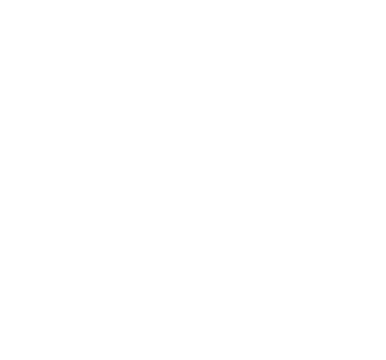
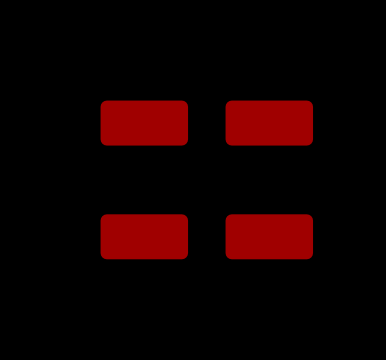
part: none -> (206, 123)
part: none -> (206, 236)

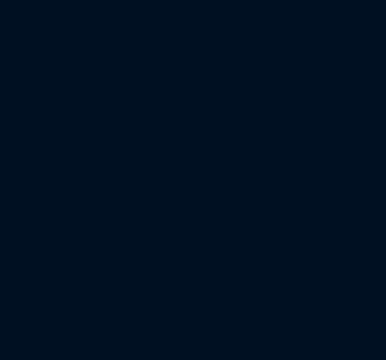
part: (206, 123) -> none
part: (206, 236) -> none

